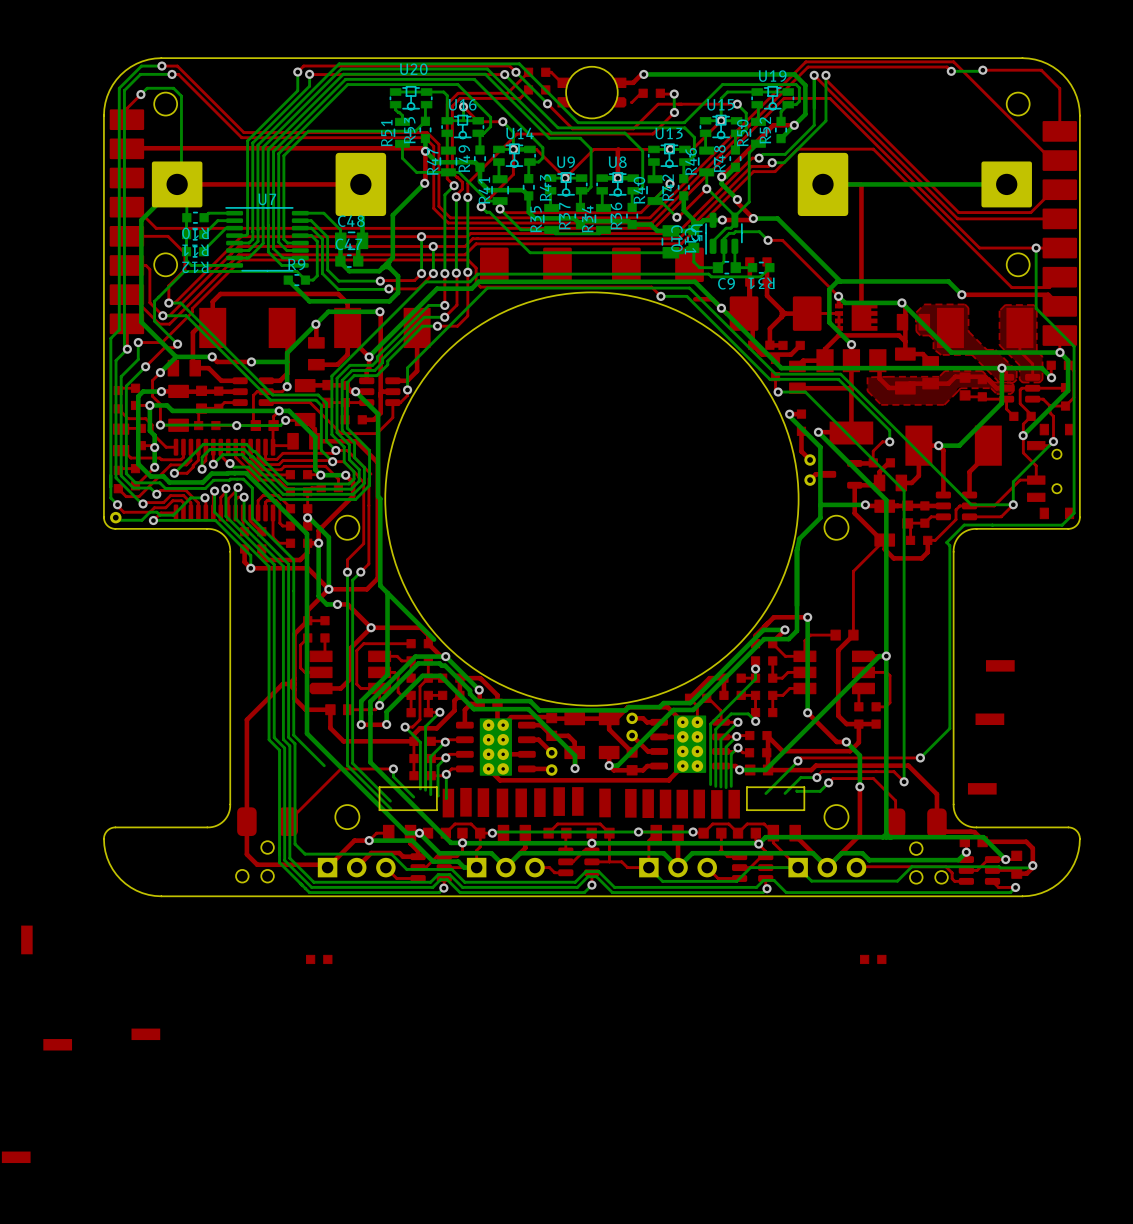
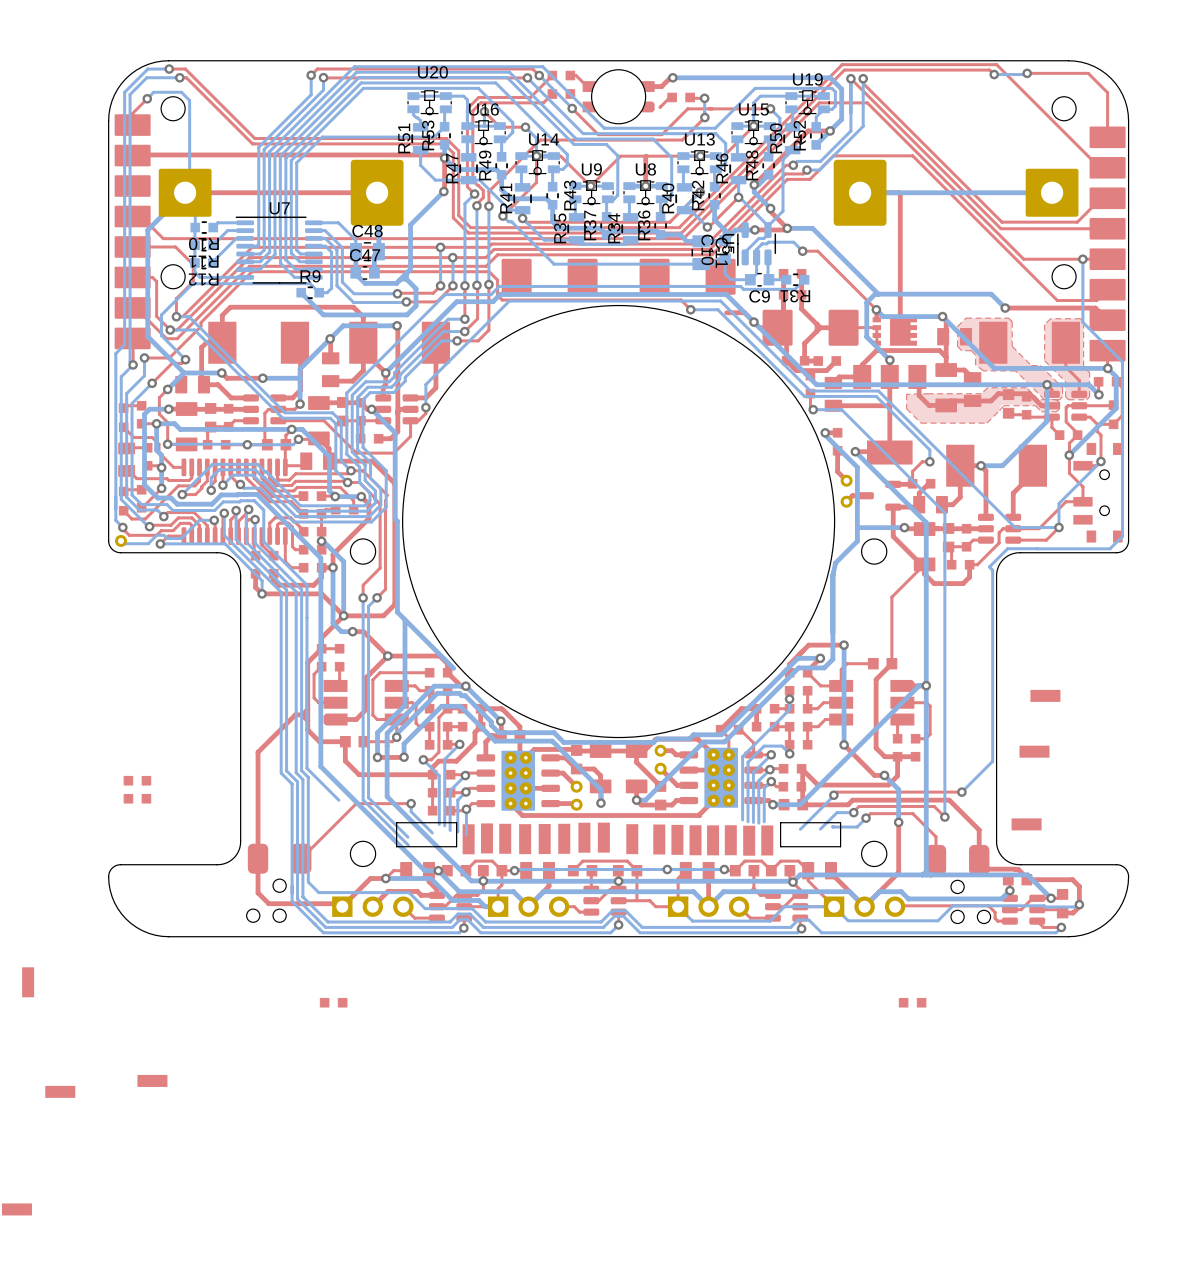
part: none -> (137, 780)
part: none -> (137, 798)

